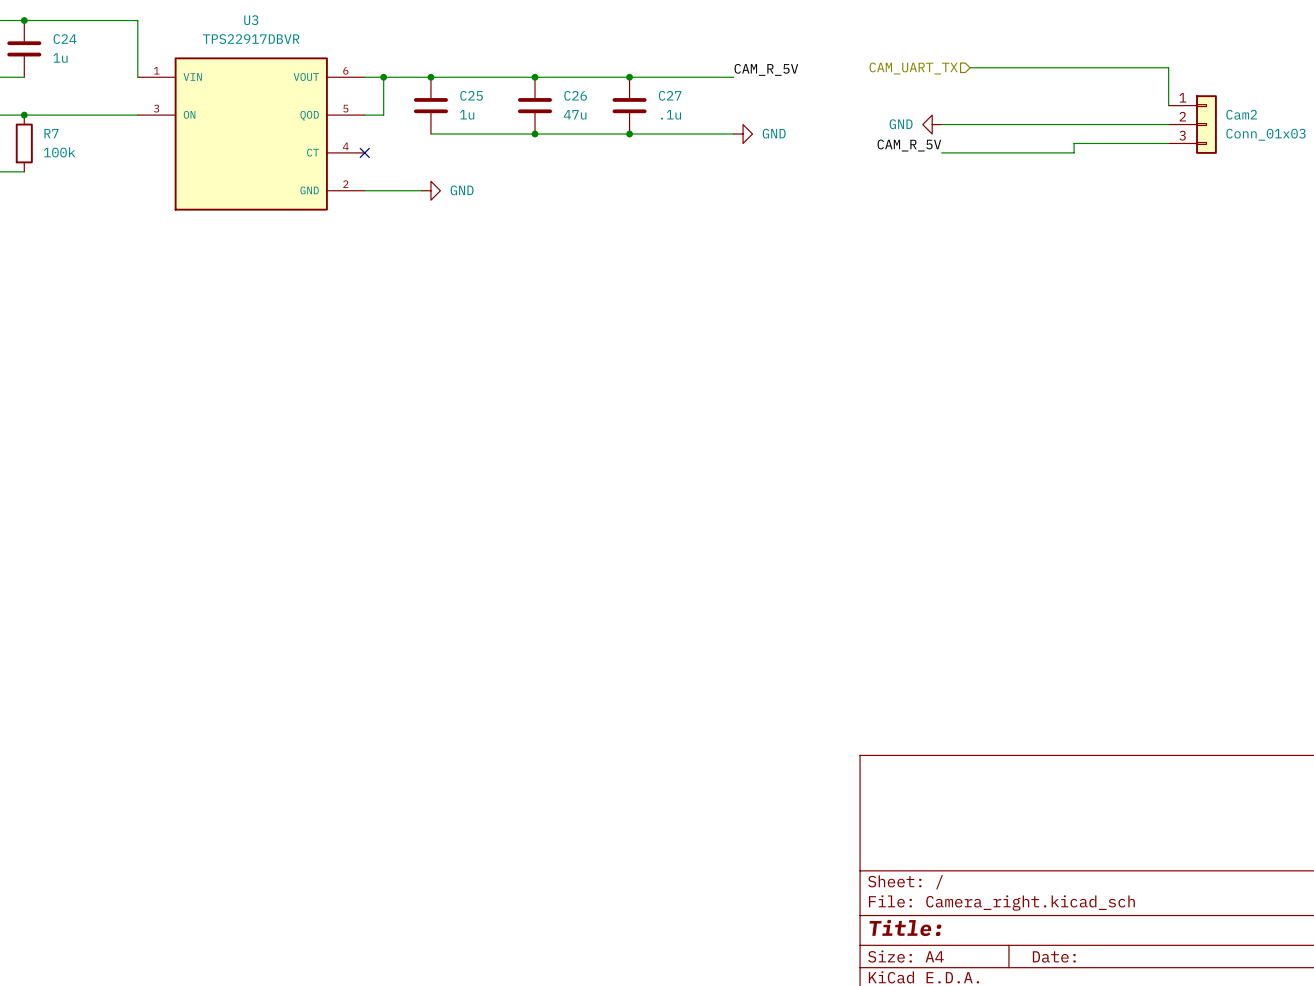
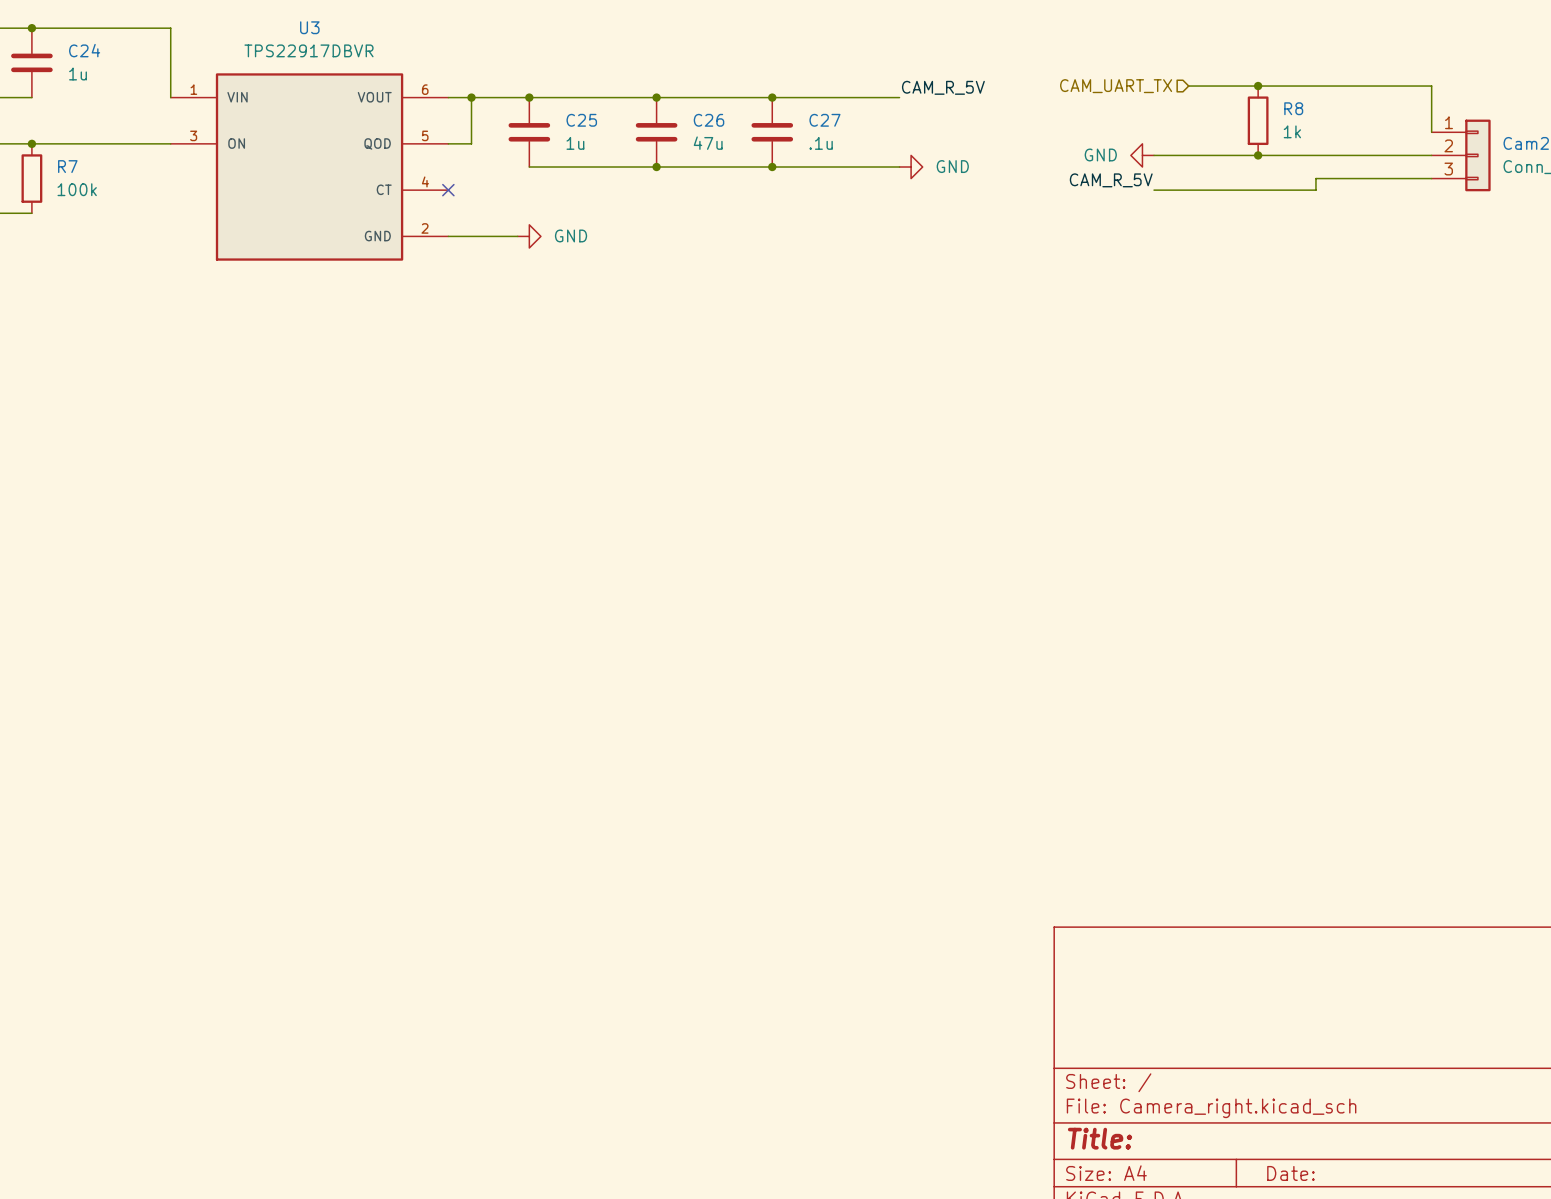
junction: none -> (1258, 86)
R8: none -> 1k (1258, 120)
junction: none -> (1258, 155)

